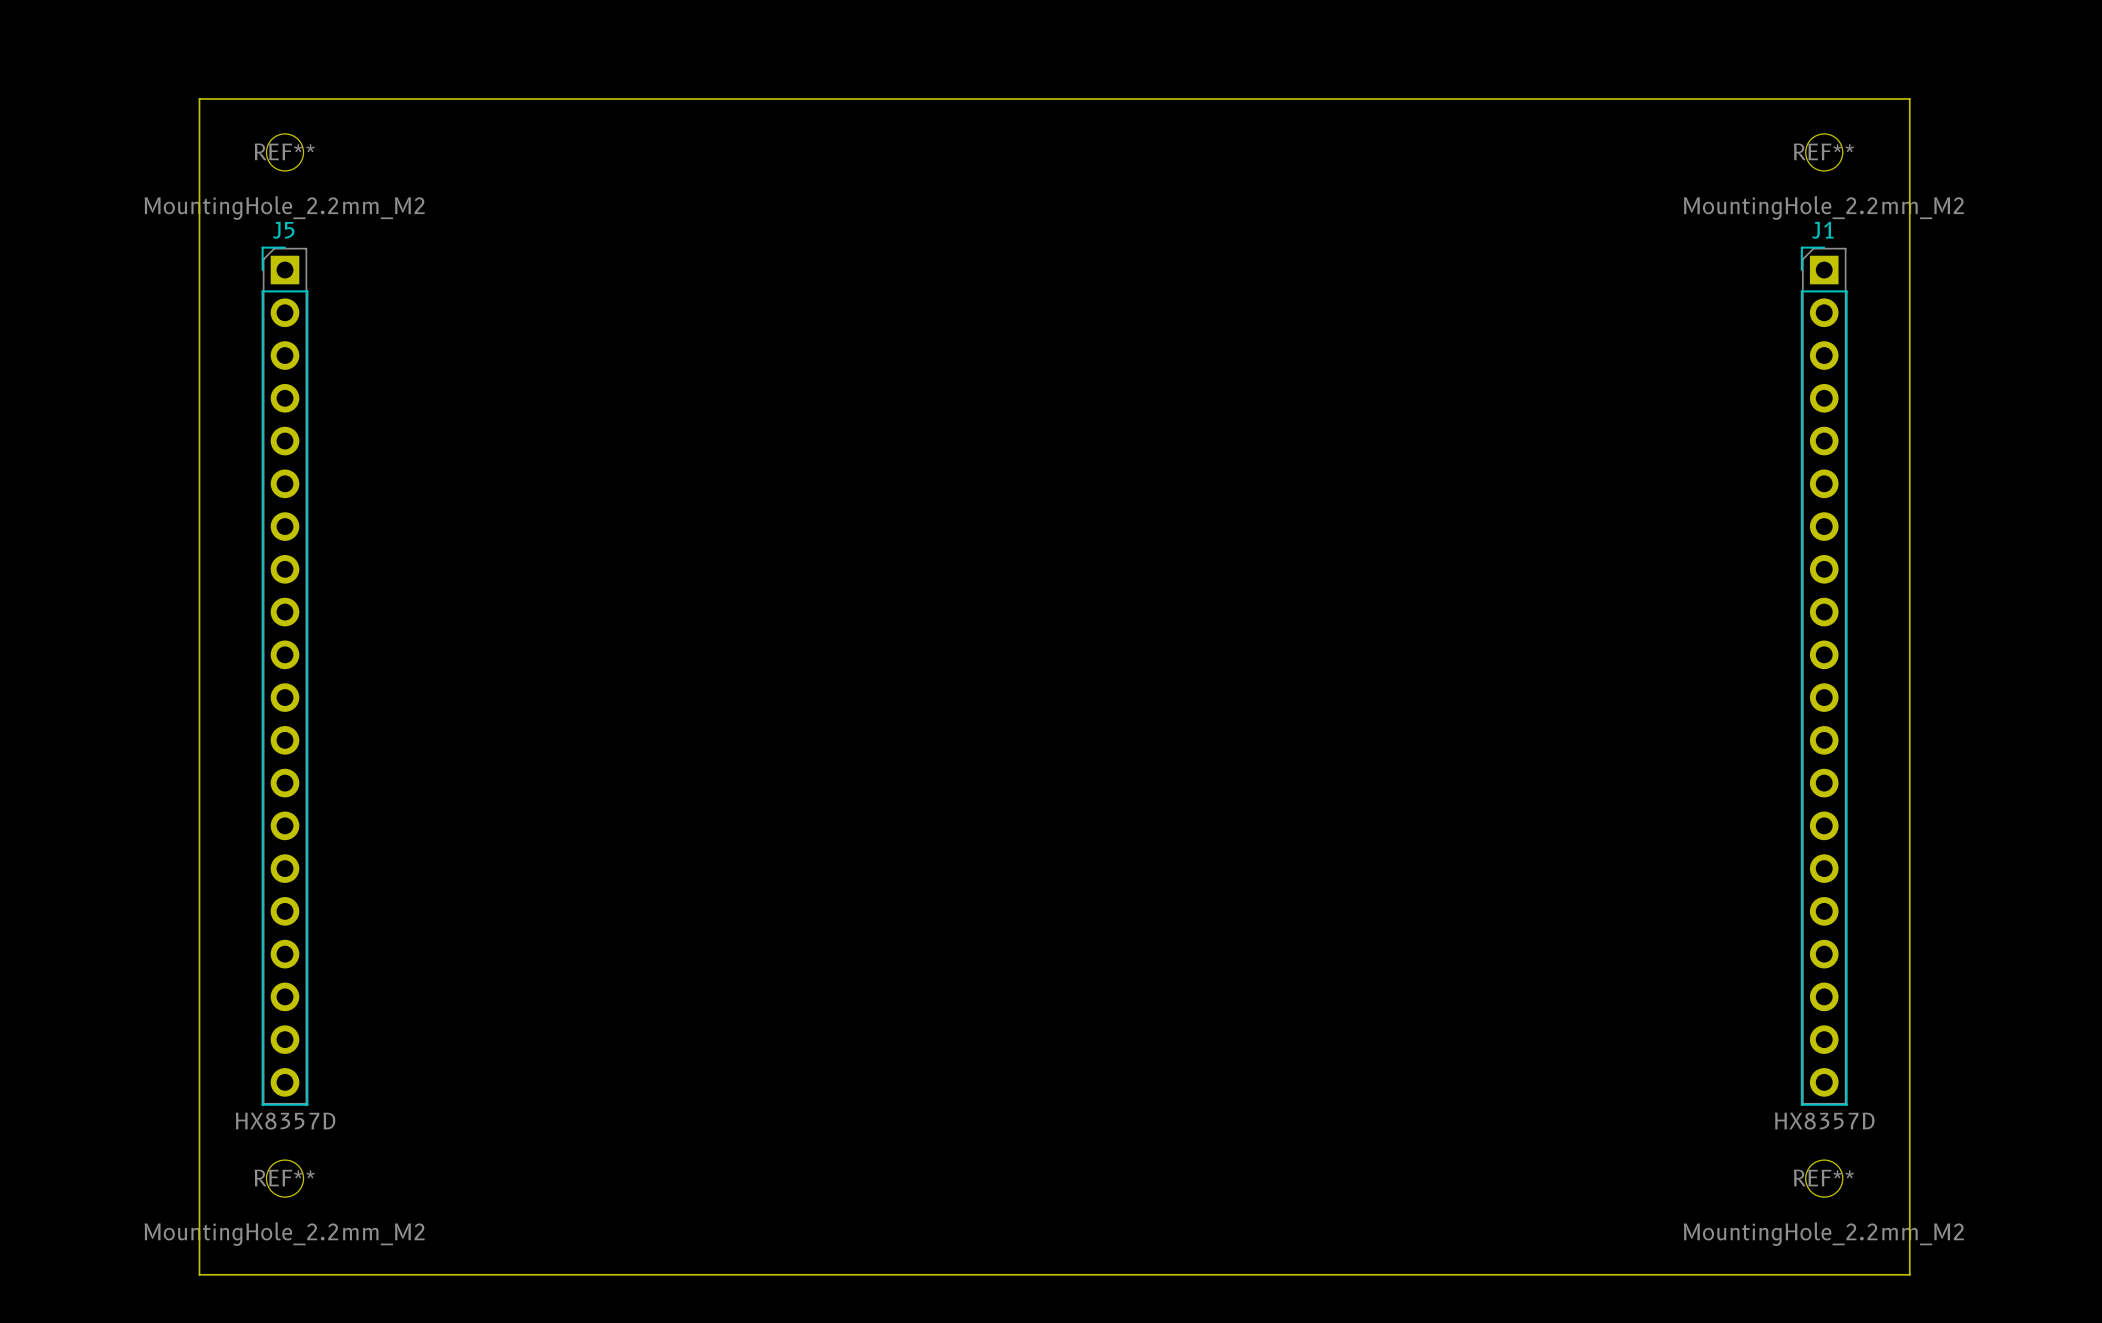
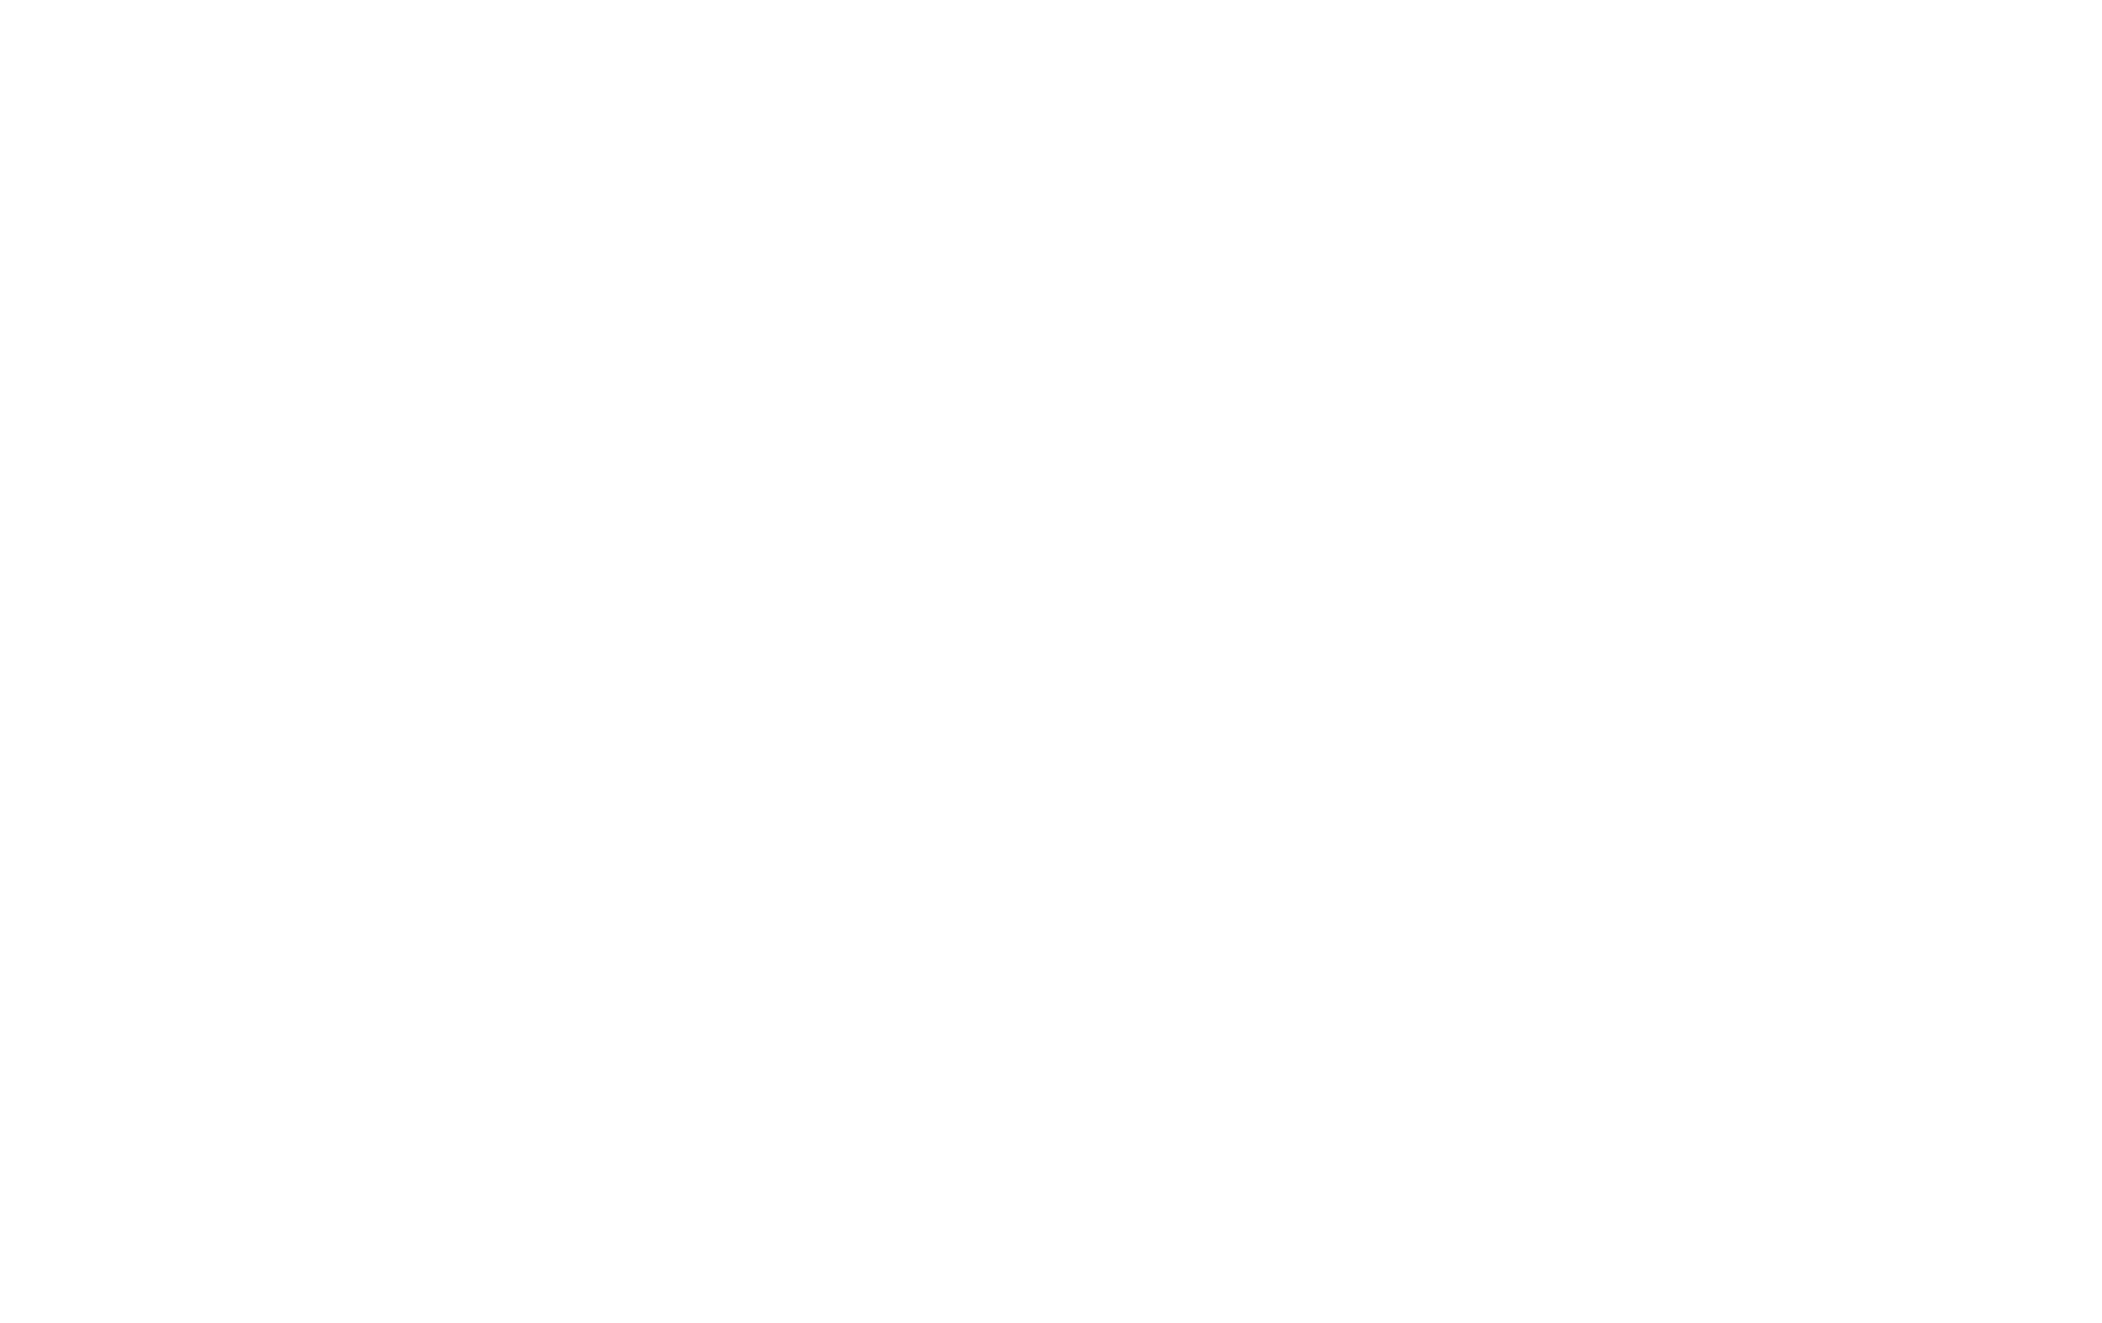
board edge: (199, 99) (1909, 99) (1909, 1274) (199, 1274) (199, 99) -> none
REF**: MountingHole_2.2mm_M2 (285, 152) -> none
REF**: MountingHole_2.2mm_M2 (1824, 152) -> none
J5: HX8357D (285, 676) -> none
J1: HX8357D (1824, 676) -> none
REF**: MountingHole_2.2mm_M2 (285, 1178) -> none
REF**: MountingHole_2.2mm_M2 (1824, 1178) -> none

